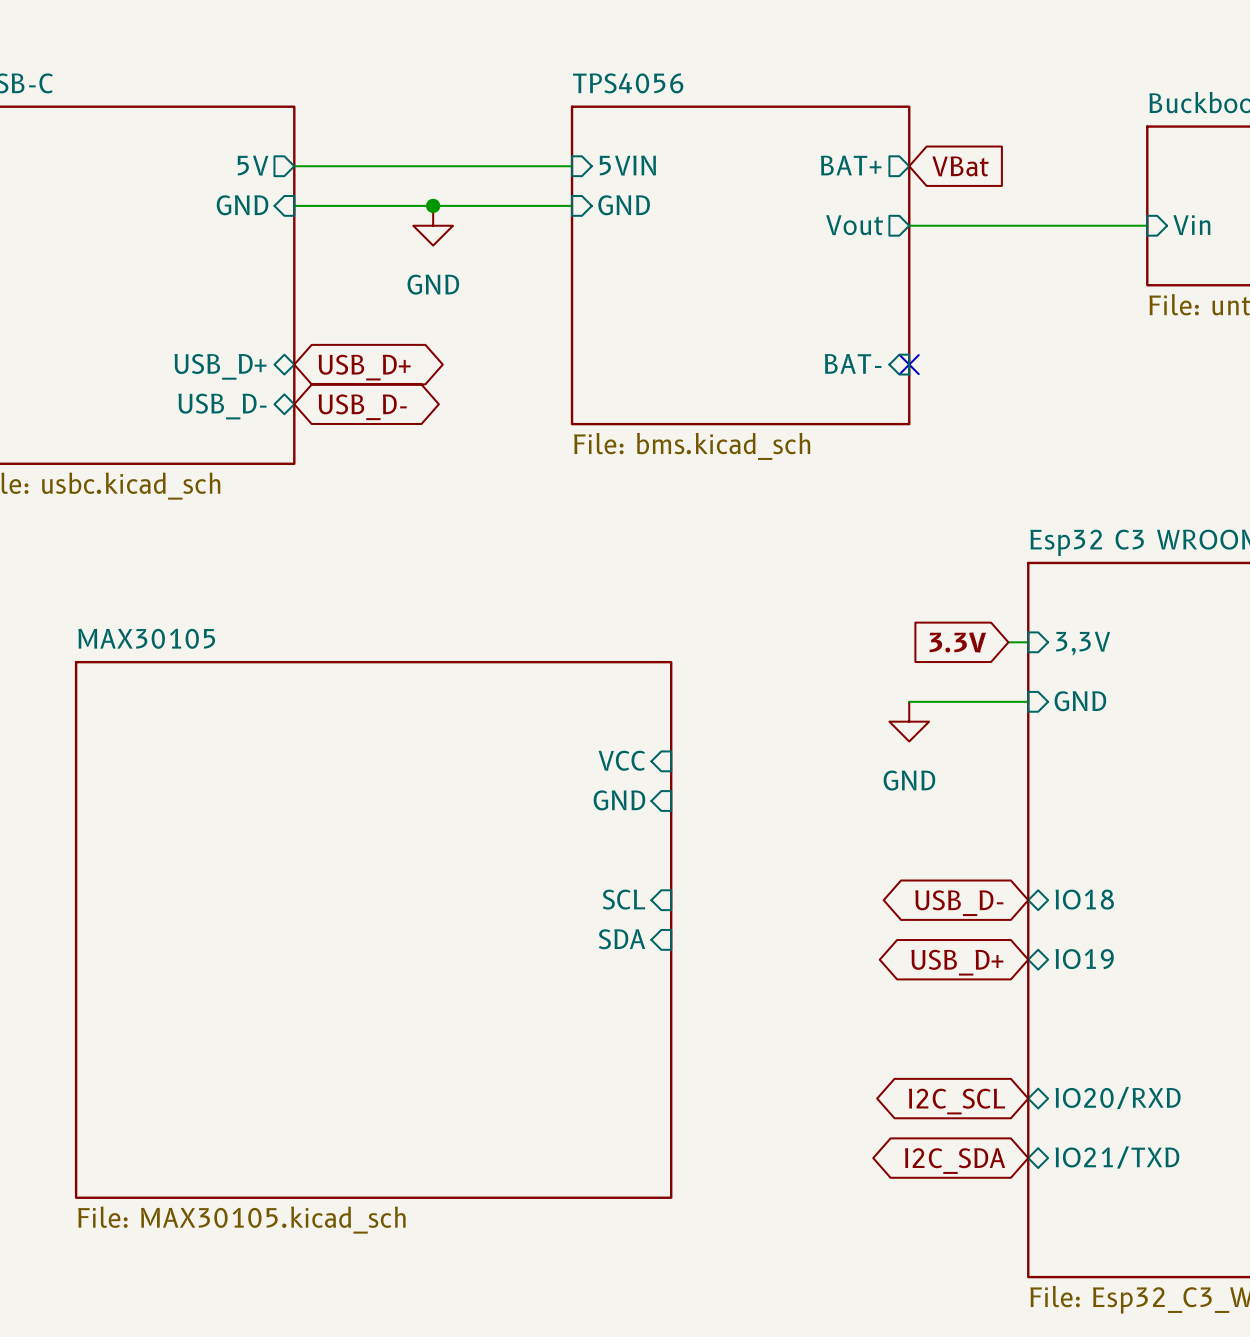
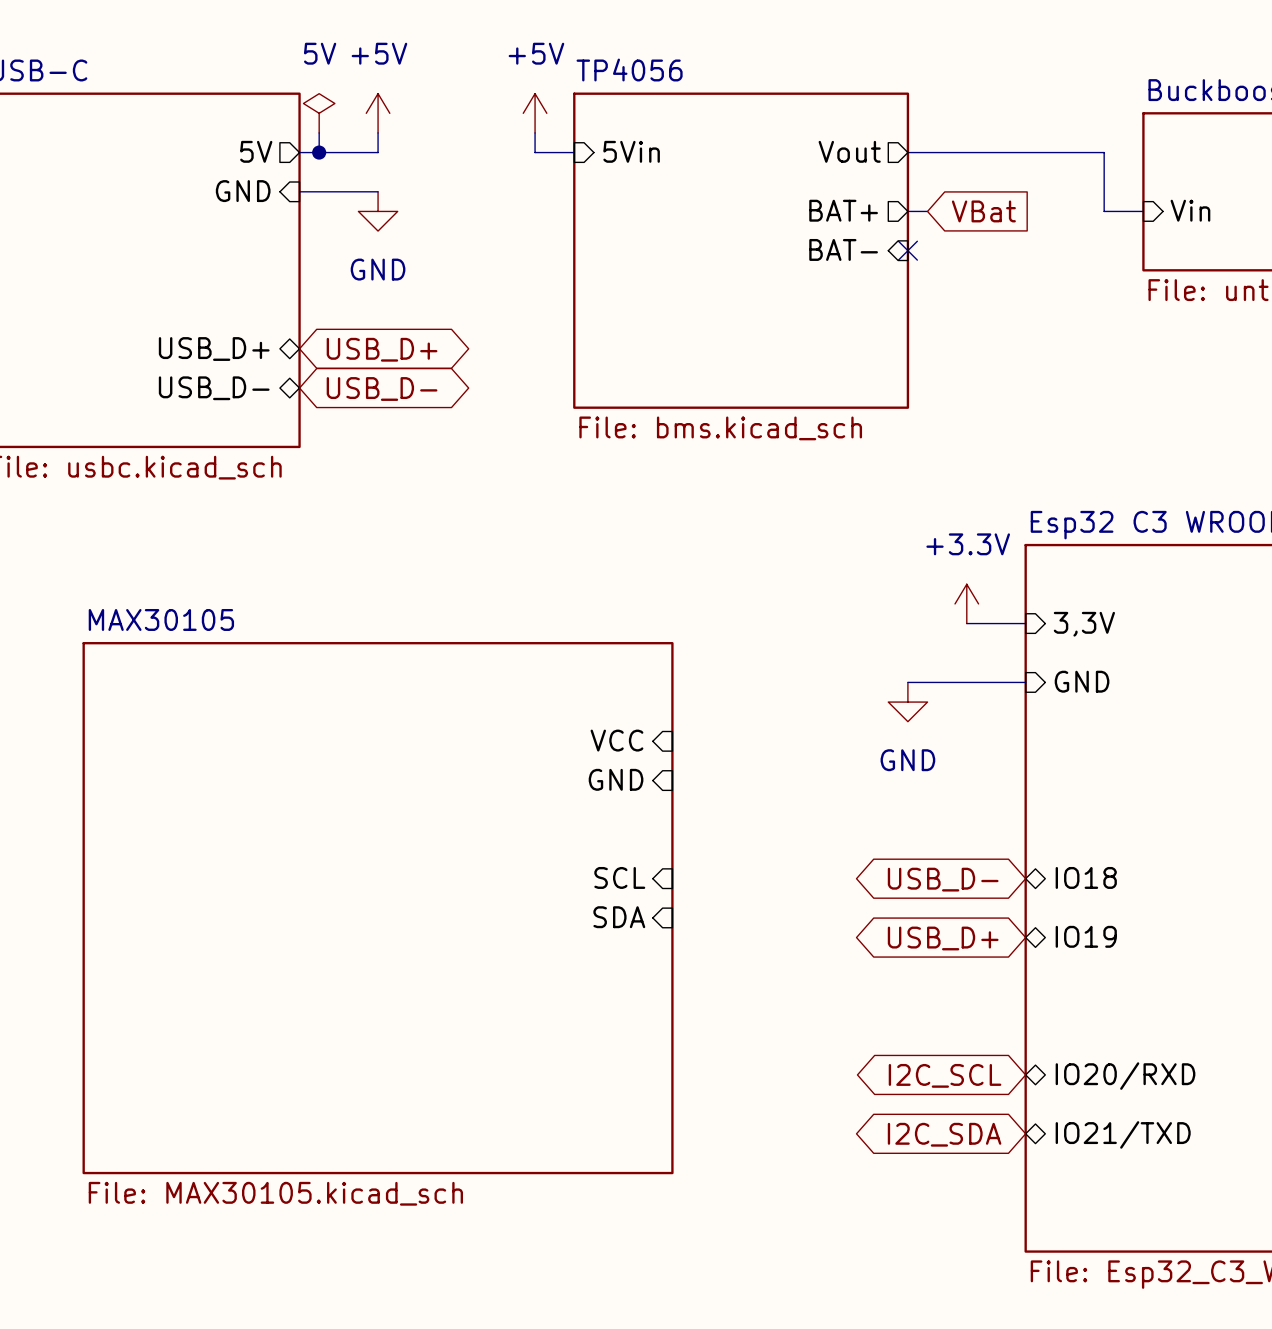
sheet TPS4056 name: TPS4056 (628, 83) -> TP4056 (629, 70)
power symbol: none -> 5V (319, 113)
power symbol: none -> +5V (378, 113)
power symbol: none -> +5V (535, 113)
wire: none -> (319, 132) (319, 152)
wire: none -> (535, 132) (535, 152)
sheet pin: 5VIN (627, 165) -> 5Vin (631, 151)
sheet pin: BAT+ (851, 165) -> Vout (849, 151)
junction: none -> (319, 152)
wire: (373, 166) (532, 166) -> (378, 152) (378, 132)
global label position: VBat (960, 166) -> VBat (983, 211)
wire: (373, 205) (572, 205) -> none
junction: (433, 205) -> none
sheet pin: GND (624, 205) -> none
power symbol position: GND (433, 225) -> GND (378, 211)
sheet pin: Vout (854, 225) -> BAT+ (843, 210)
wire: (929, 225) (1107, 225) -> (907, 152) (1104, 152) (1104, 211)
no-connect mark: none -> (907, 250)
sheet pin position: BAT- (853, 363) -> BAT- (843, 249)
no-connect mark: (909, 364) -> none
power symbol: none -> +3.3V (966, 603)
global label: 3.3V (957, 642) -> none
wire: none -> (966, 623) (1006, 623)

